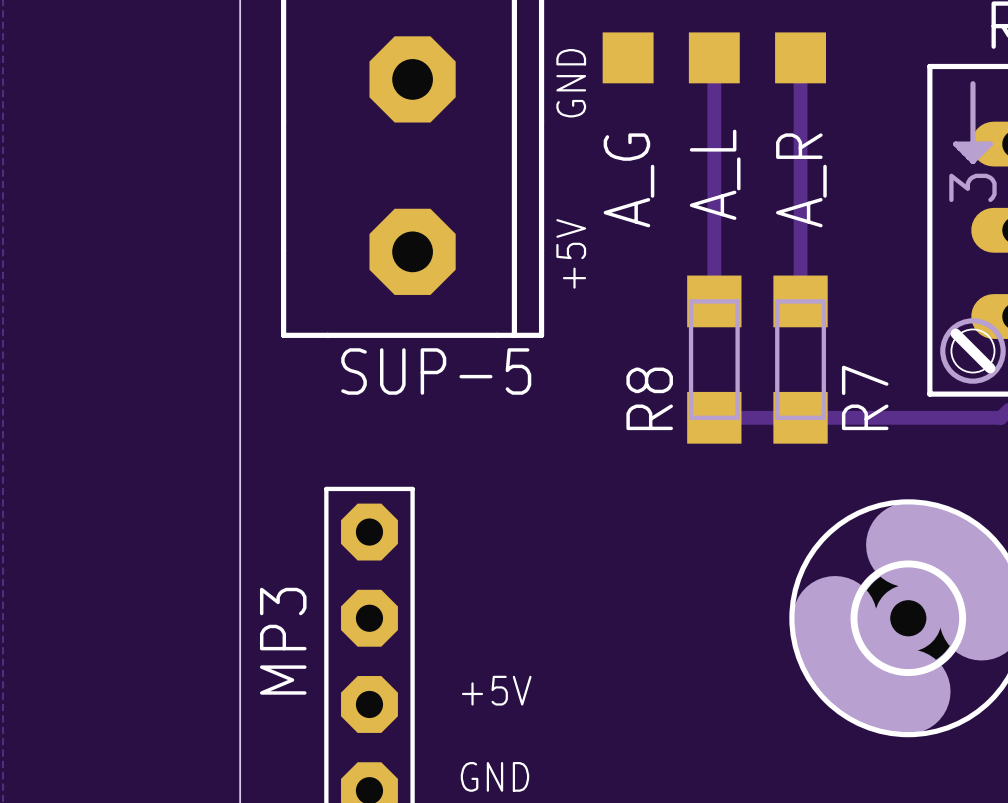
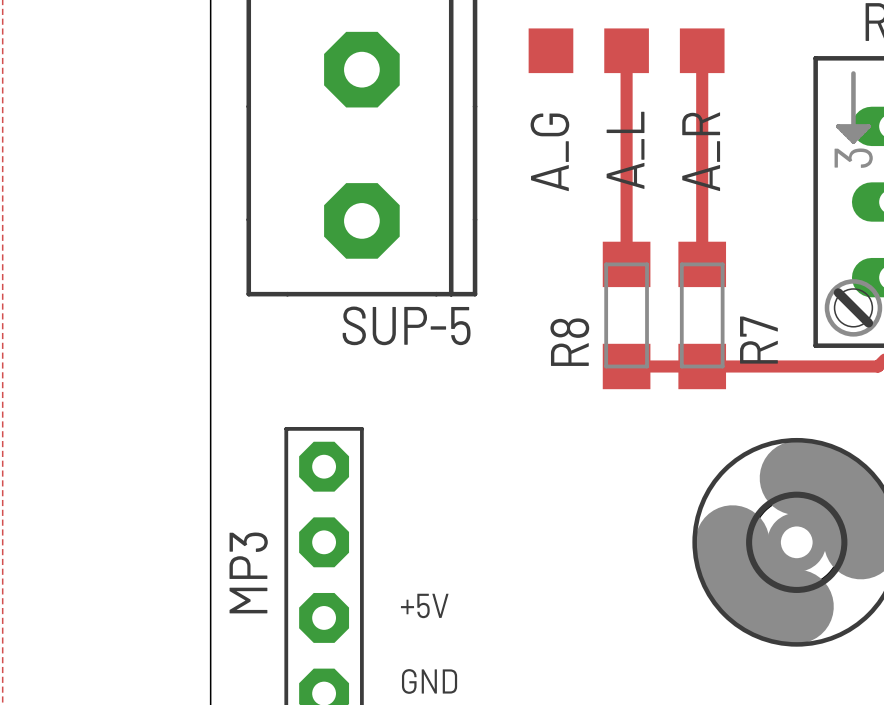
text: GND (571, 83) -> none
text: +5V (571, 253) -> none

